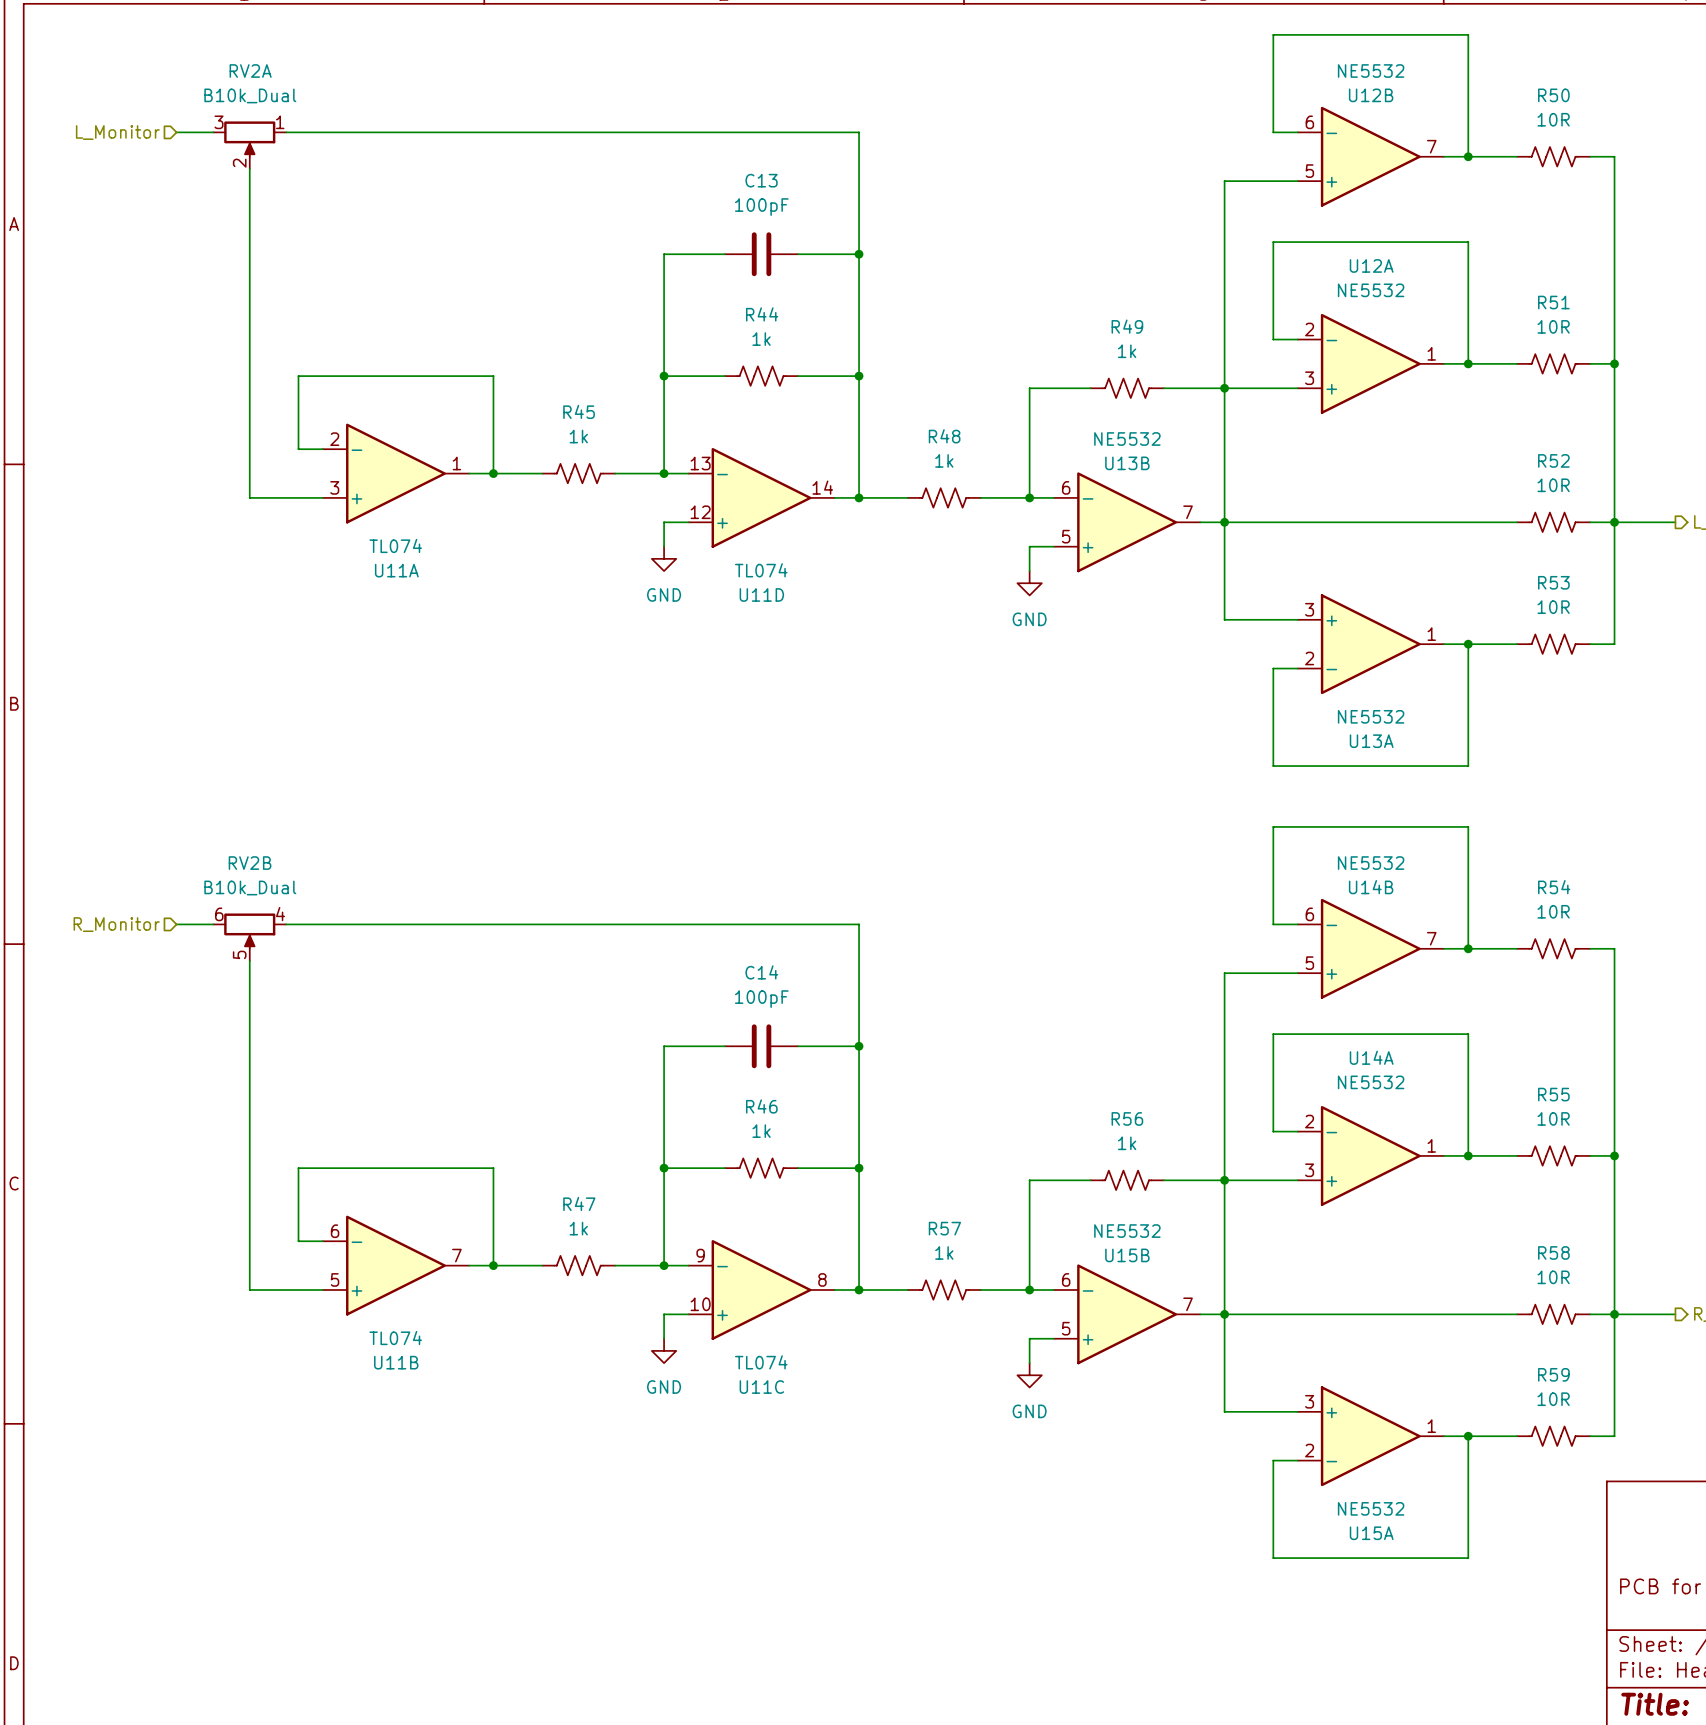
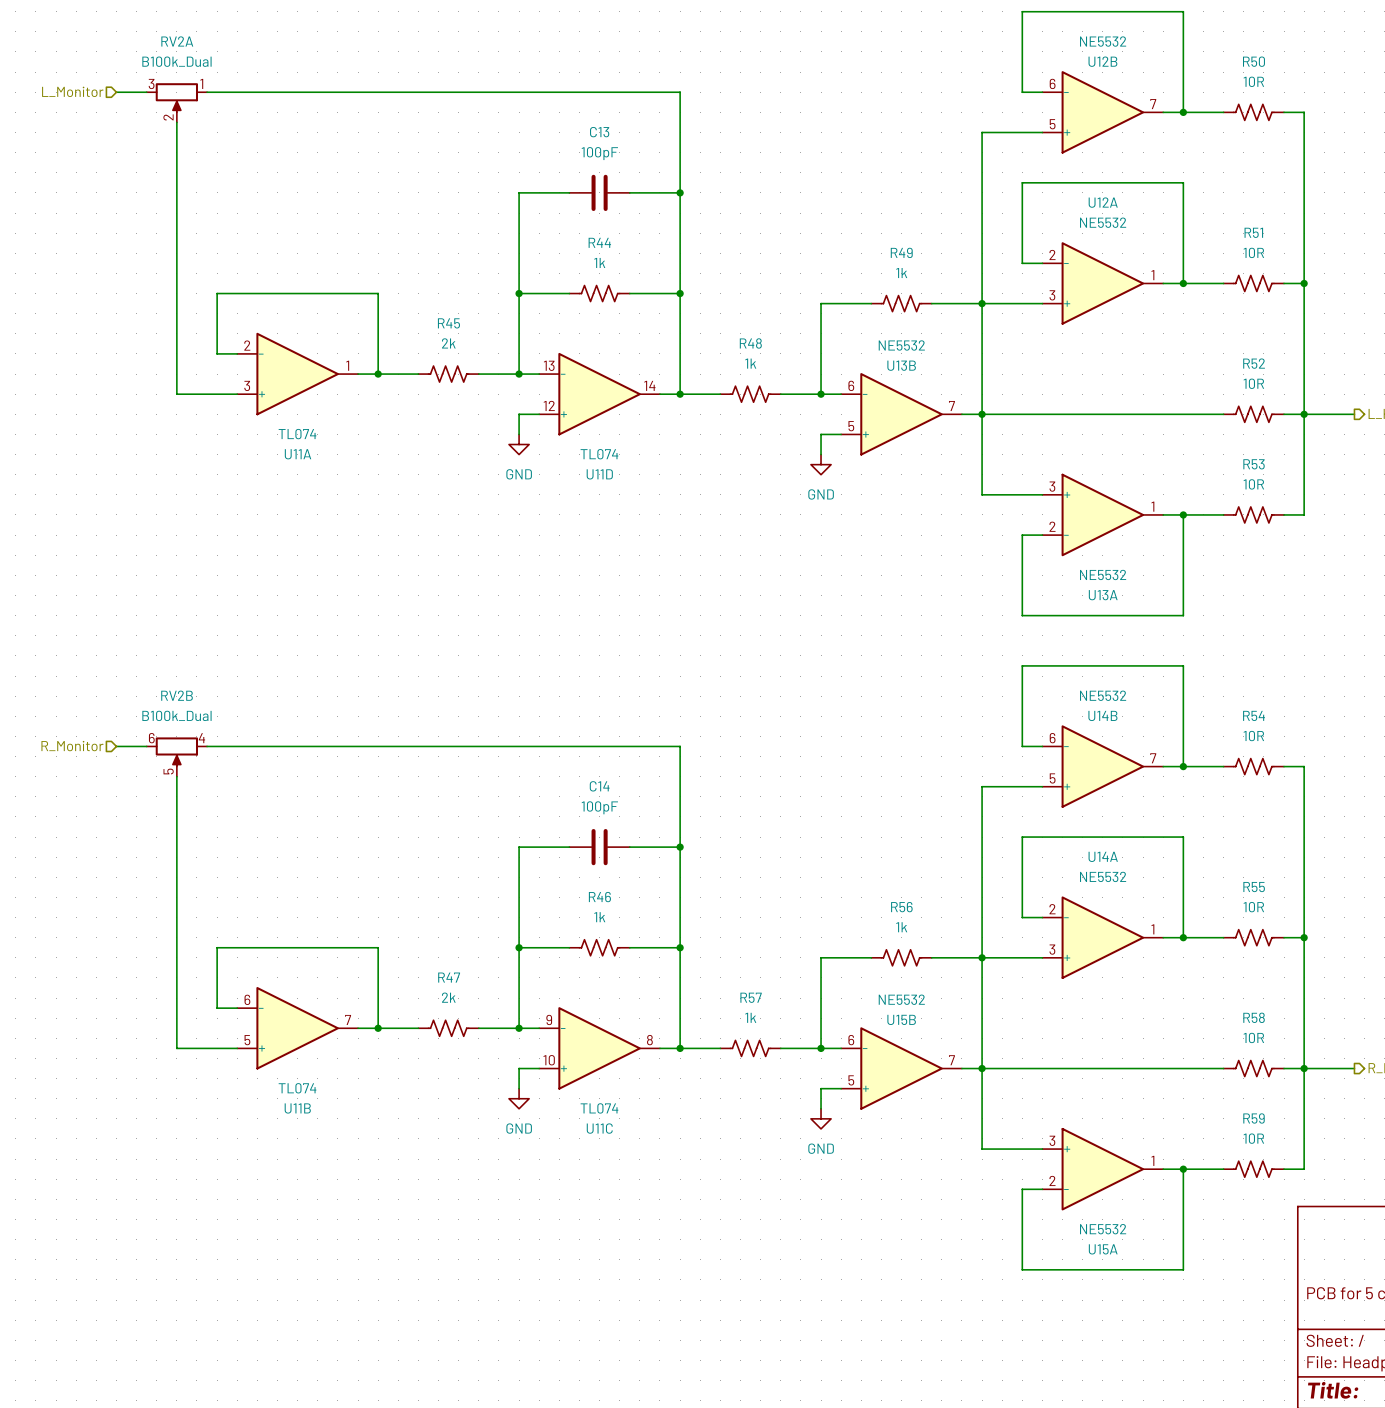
RV2A value: B10k_Dual (250, 95) -> B100k_Dual (176, 61)
R45 value: 1k (578, 436) -> 2k (448, 343)
RV2B value: B10k_Dual (250, 888) -> B100k_Dual (176, 715)
R47 value: 1k (578, 1228) -> 2k (448, 997)

